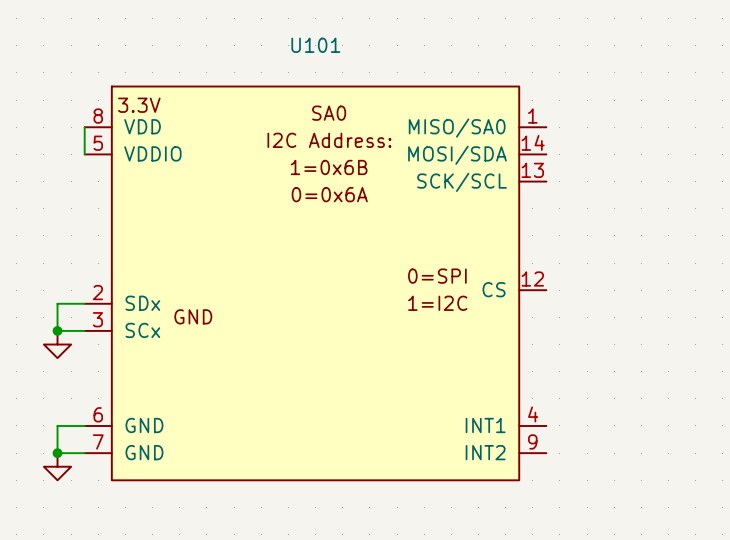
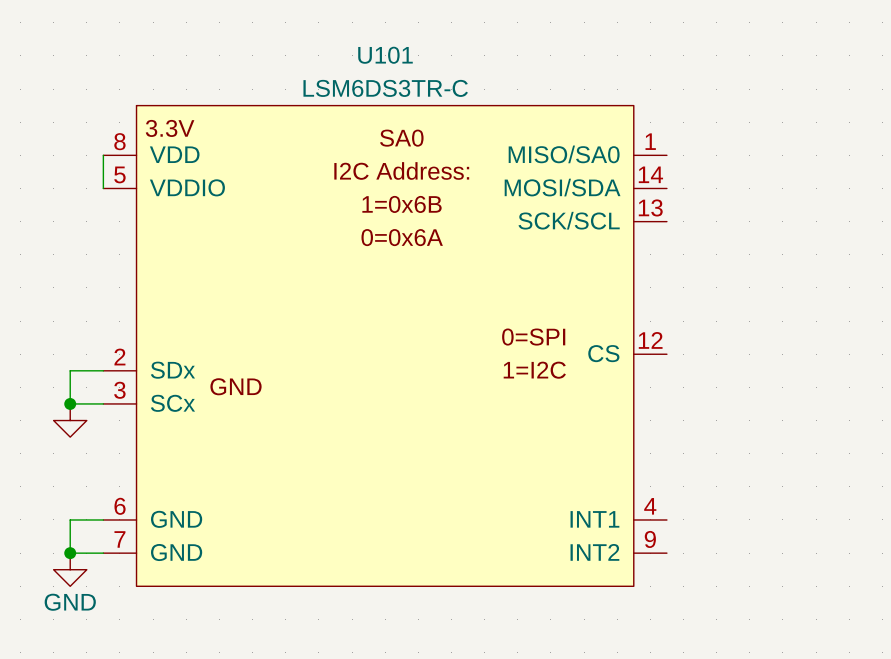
U101 value: none -> LSM6DS3TR-C (385, 88)
power symbol text: none -> GND (70, 602)

